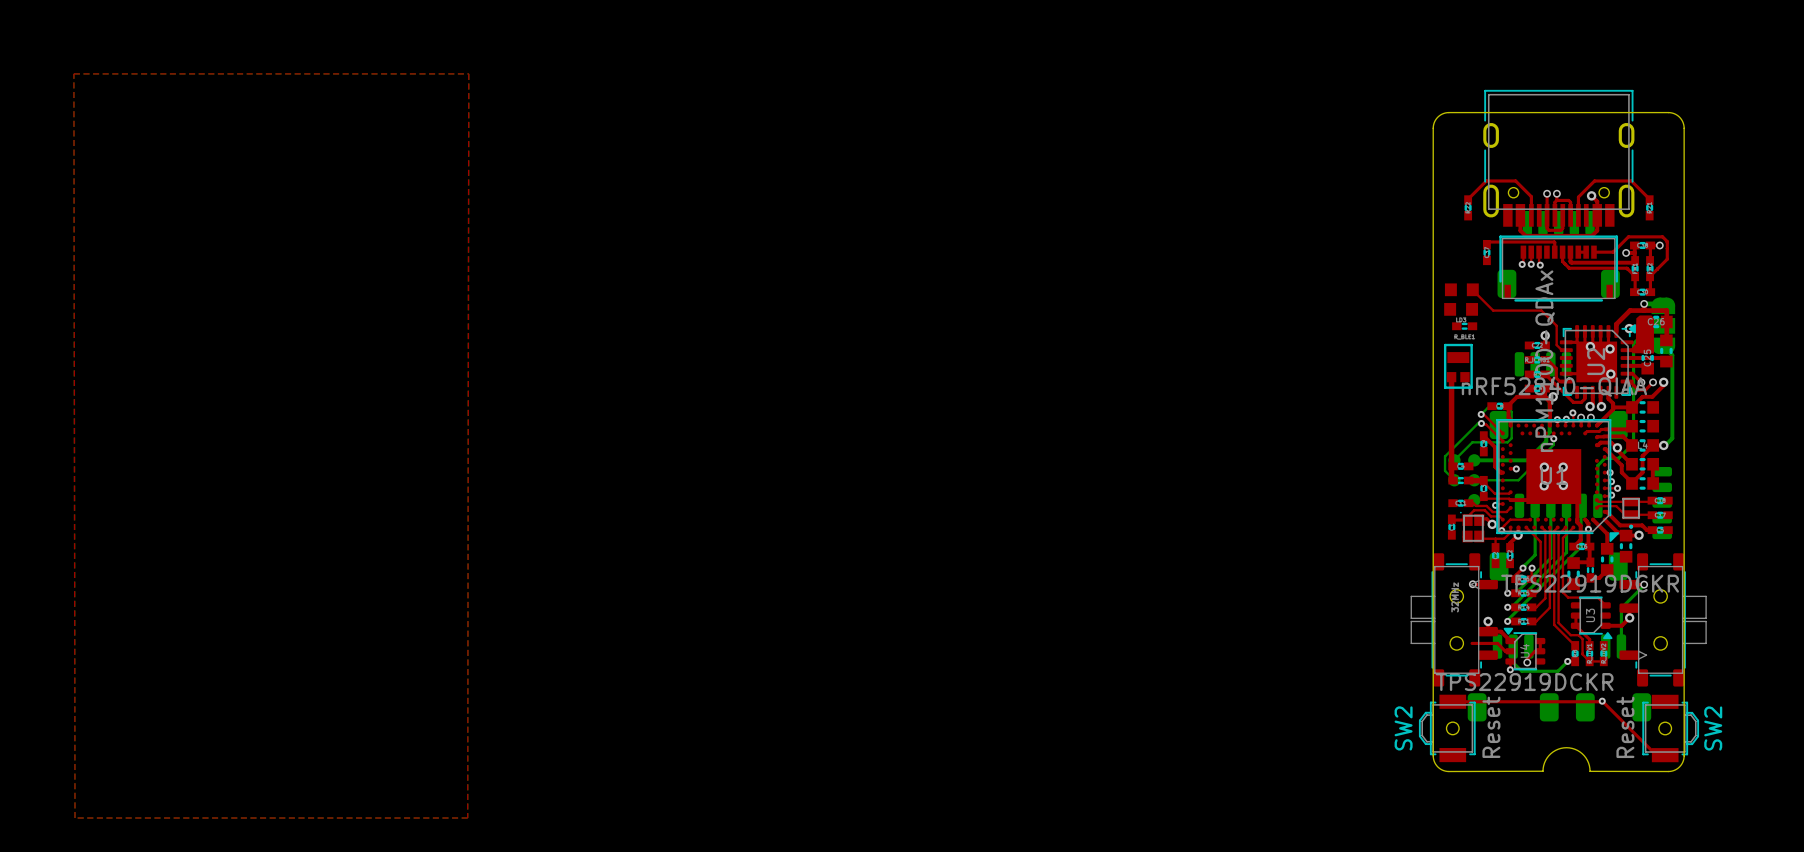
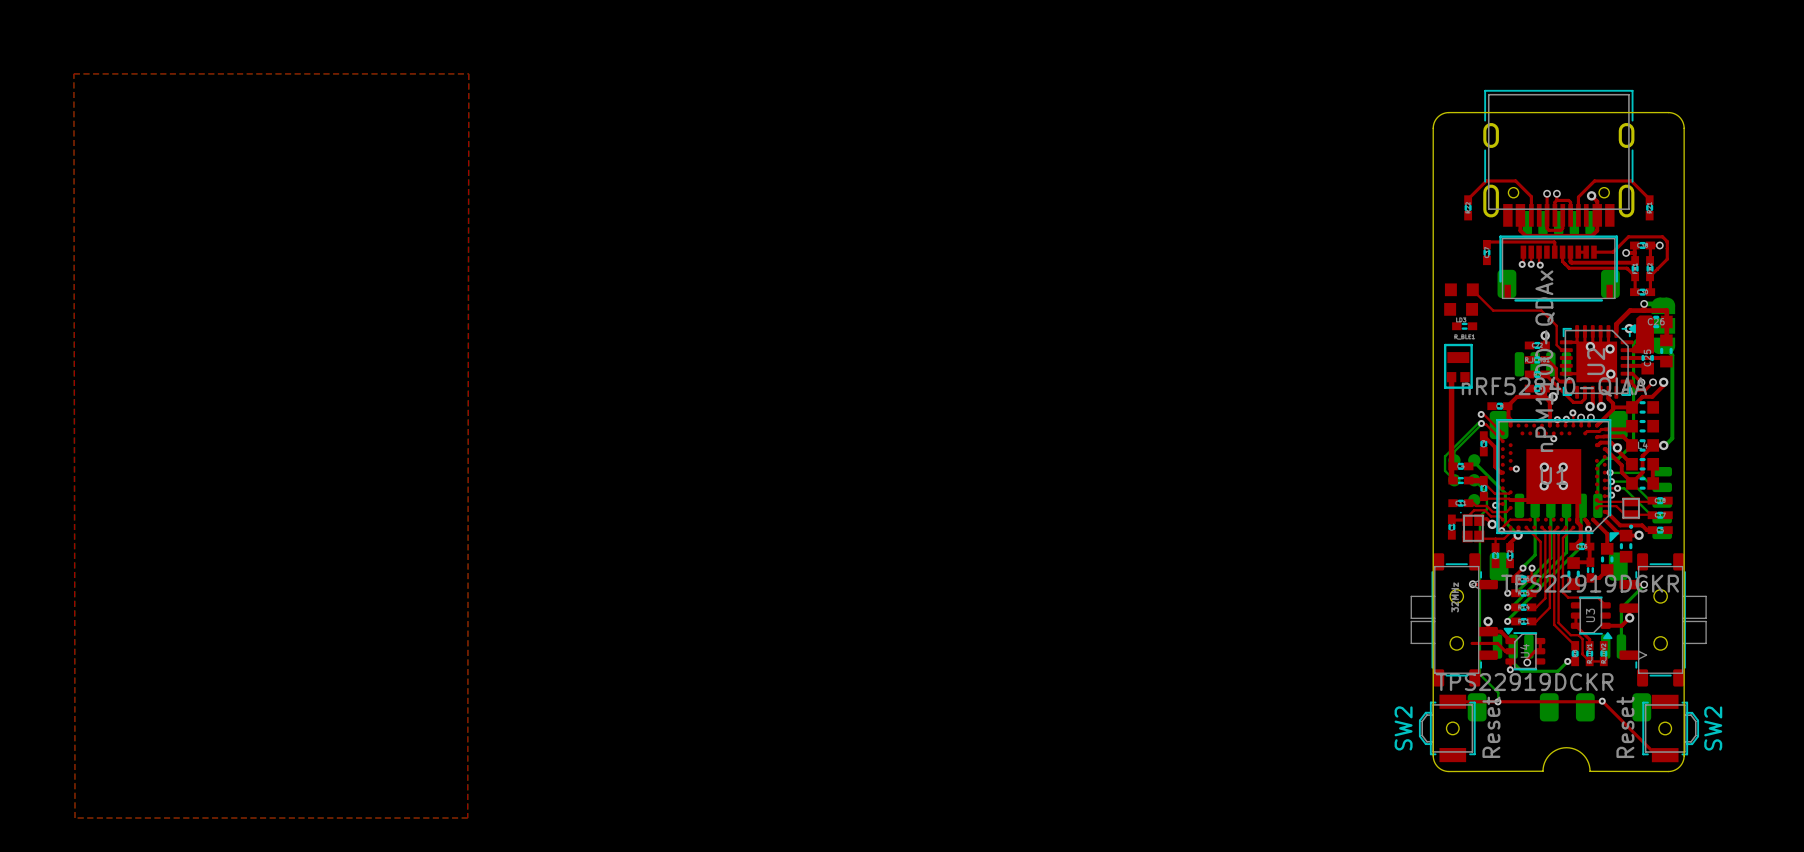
bottom track: (1553, 396) (1549, 400) (1549, 432) (1546, 435) (1546, 441) (1527, 460) (1474, 460) -> (1518, 535) (1505, 522) (1505, 493) (1472, 460) (1474, 460)
bottom track: (1481, 414) (1487, 407) (1507, 407) (1511, 411) (1511, 438) (1507, 442) (1472, 442) (1454, 460) -> (1482, 423) (1454, 451) (1454, 460)
bottom track: (1553, 438) (1553, 444) (1518, 480) (1474, 480) -> (1497, 701) (1498, 692) (1479, 674) (1479, 516) (1486, 509) (1486, 492) (1474, 480)
bottom track: none -> (1613, 472) (1639, 472) (1653, 487) (1662, 487)
bottom track: none -> (1611, 481) (1630, 481) (1652, 503) (1662, 503)
bottom track: none -> (1617, 488) (1624, 488) (1654, 518) (1662, 518)
via: none -> (1497, 701)

